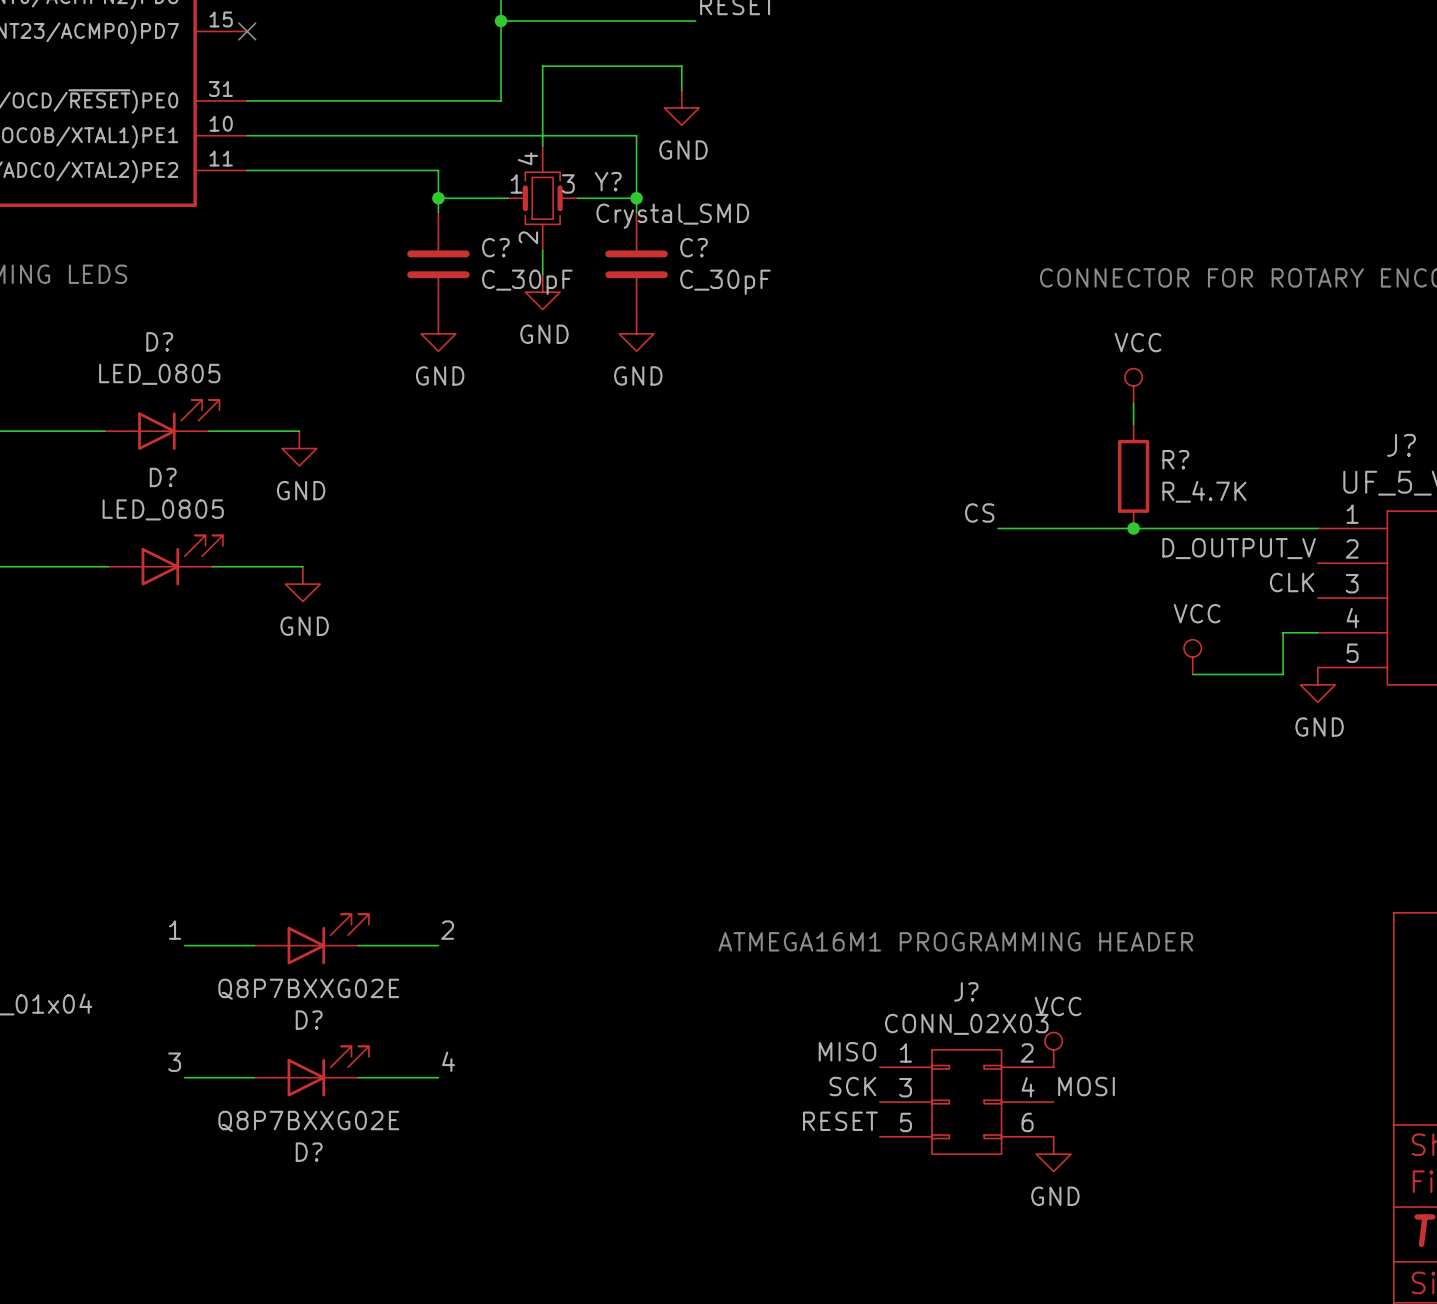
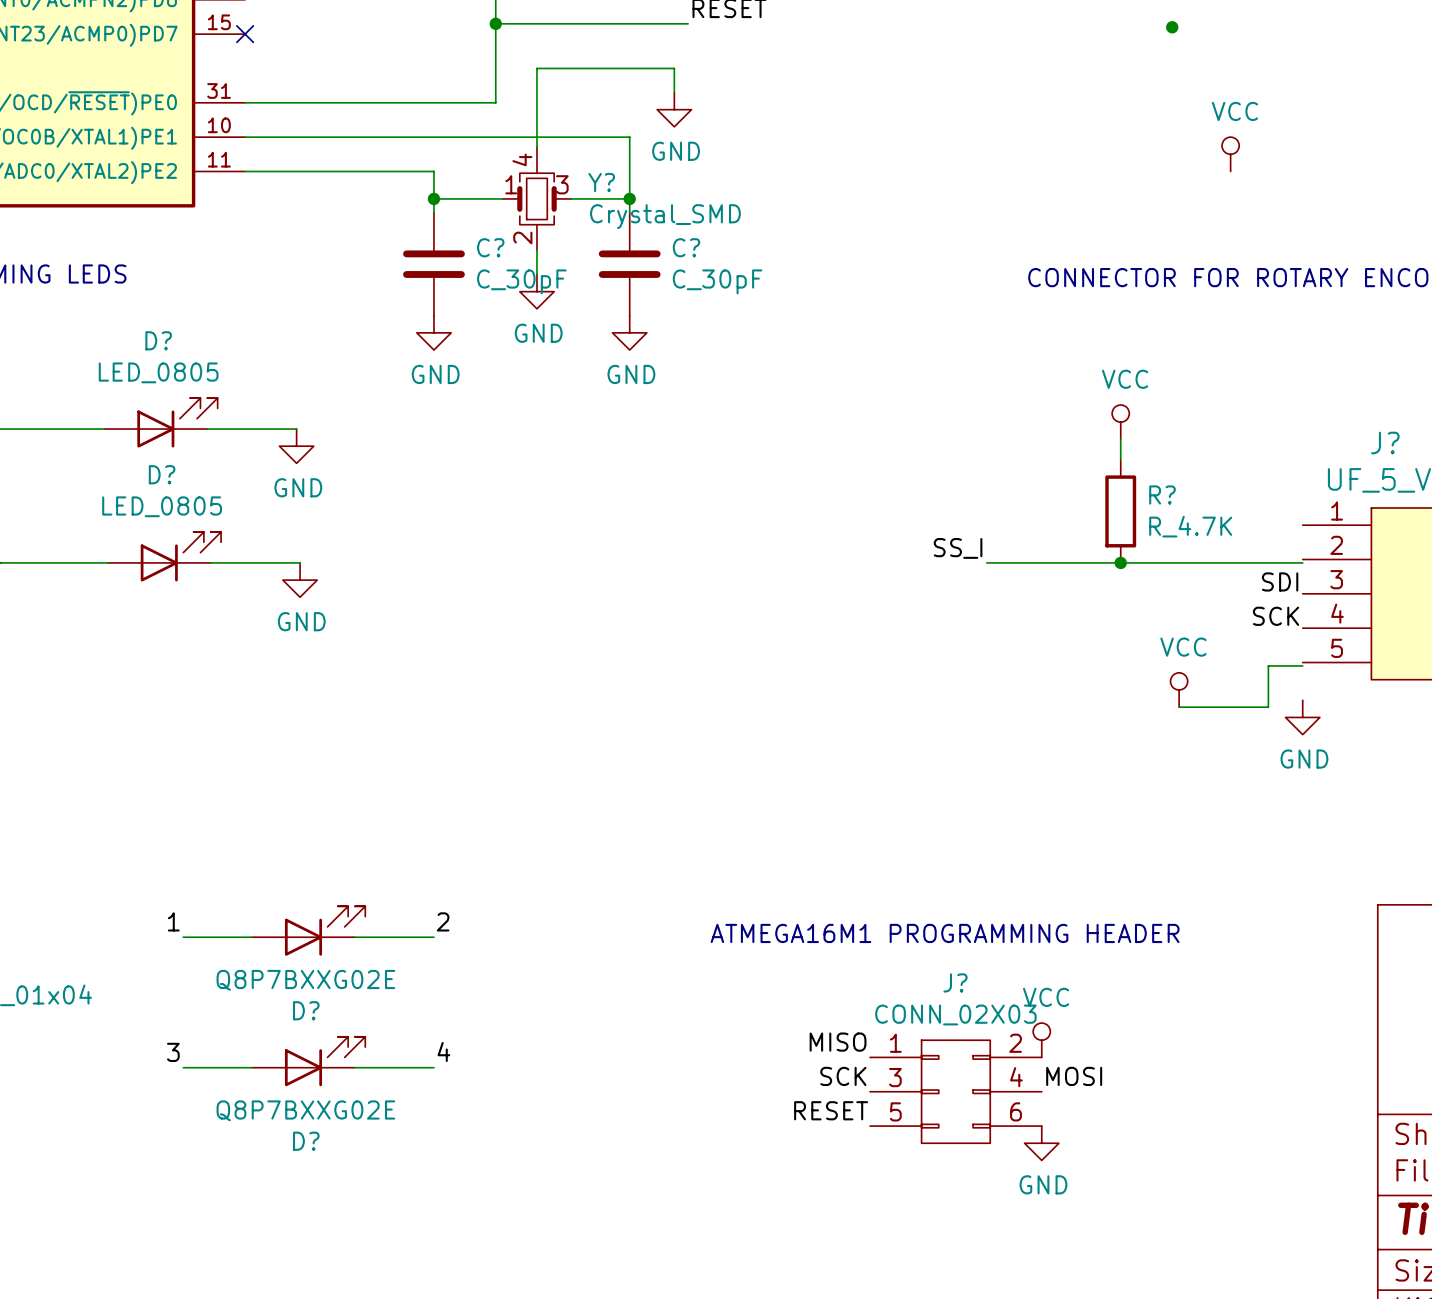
junction: none -> (1172, 27)
power symbol: none -> VCC (1230, 154)
power symbol position: VCC (1133, 385) -> VCC (1120, 422)
wire: (1133, 403) (1133, 424) -> (1120, 439) (1120, 459)
R? position: (1133, 476) -> (1120, 511)
label: CS (979, 512) -> none
wire: (998, 528) (1317, 528) -> (986, 562) (1302, 562)
junction position: (1133, 528) -> (1120, 562)
label: D_OUTPUT_V (1239, 548) -> none
label: none -> SS_I (958, 548)
label: CLK (1292, 582) -> SDI (1280, 581)
label: none -> SCK (1276, 616)
wire: (1317, 632) (1283, 632) (1283, 671) -> (1302, 665) (1268, 665)
power symbol position: VCC (1192, 657) -> VCC (1179, 689)
wire: (1192, 674) (1283, 674) -> (1179, 707) (1268, 707) (1268, 669)
power symbol position: GND (1317, 684) -> GND (1302, 717)

